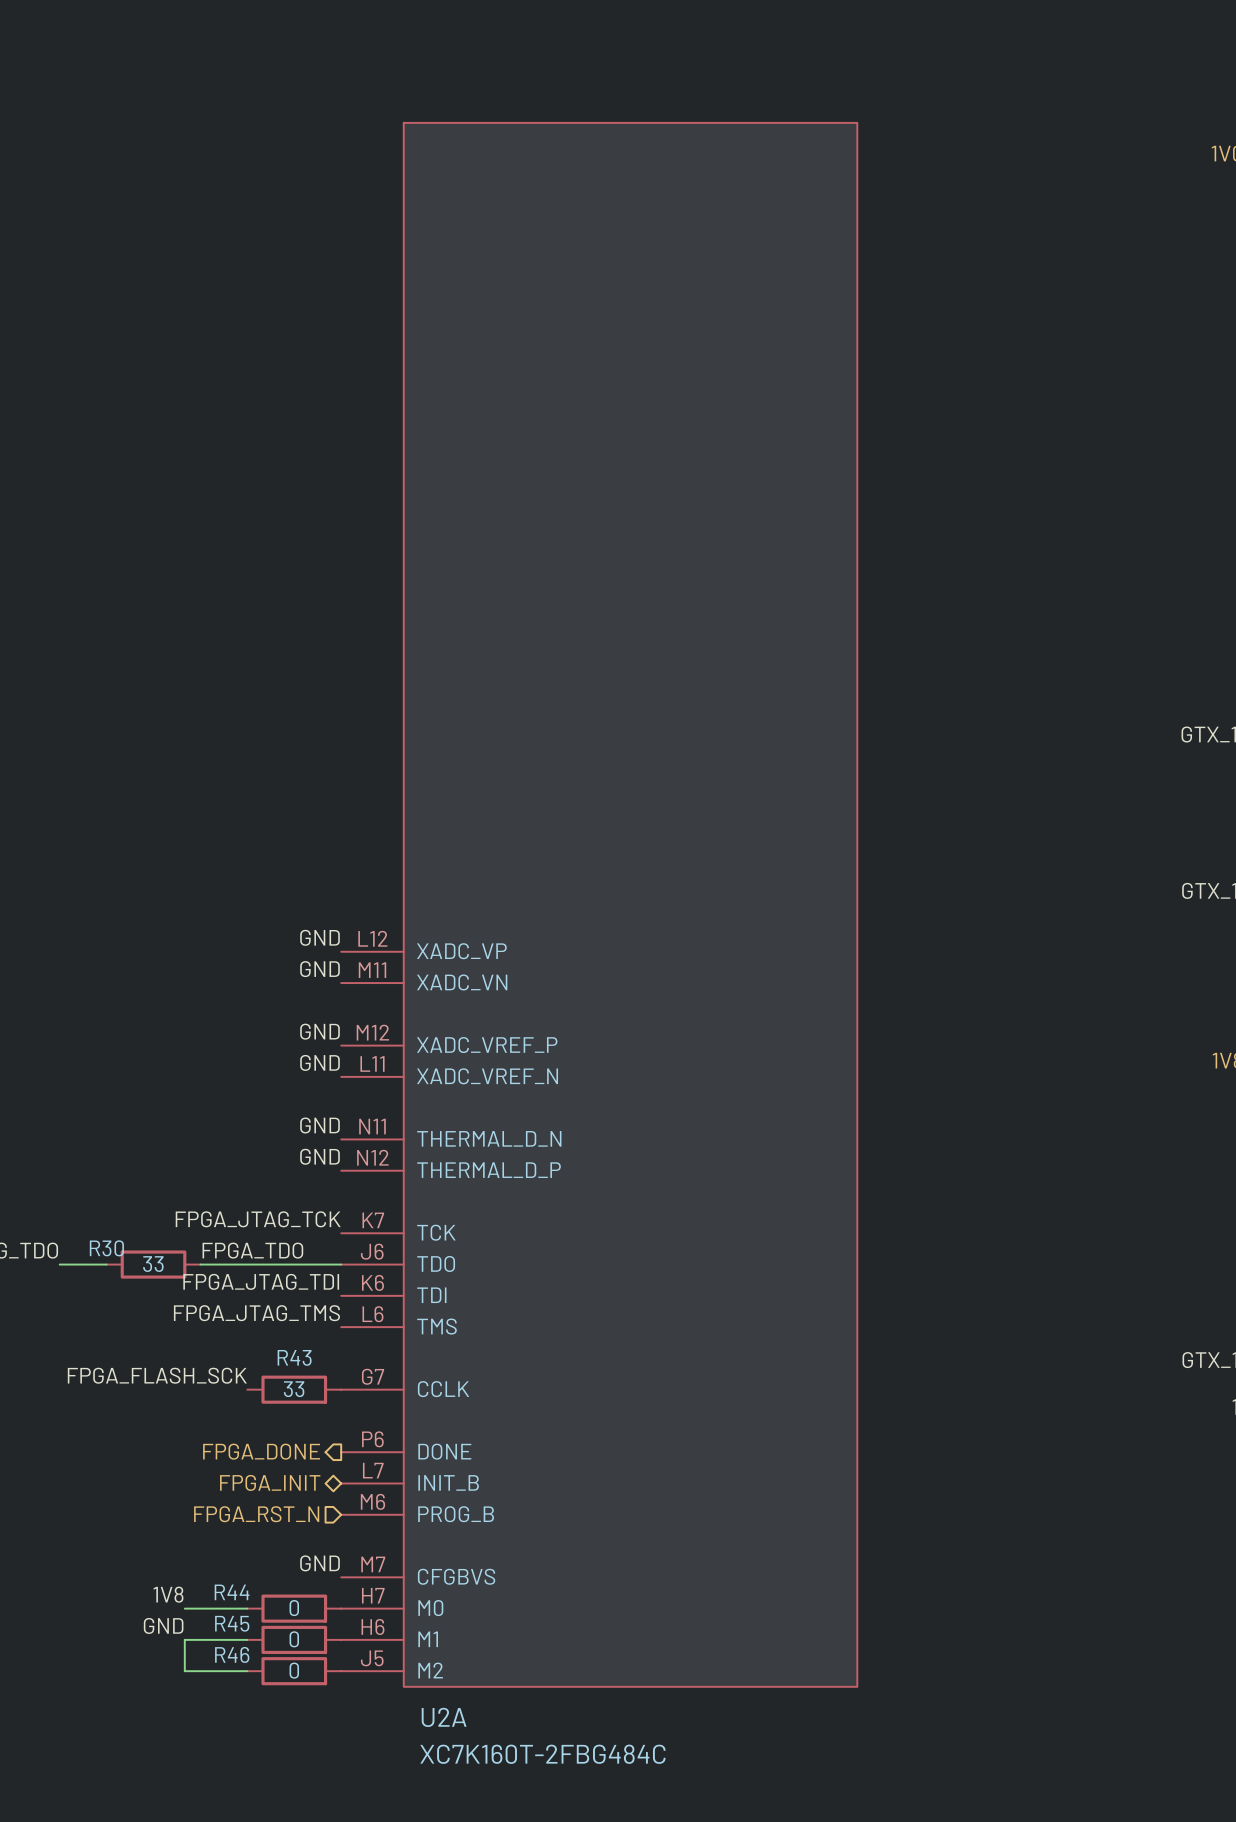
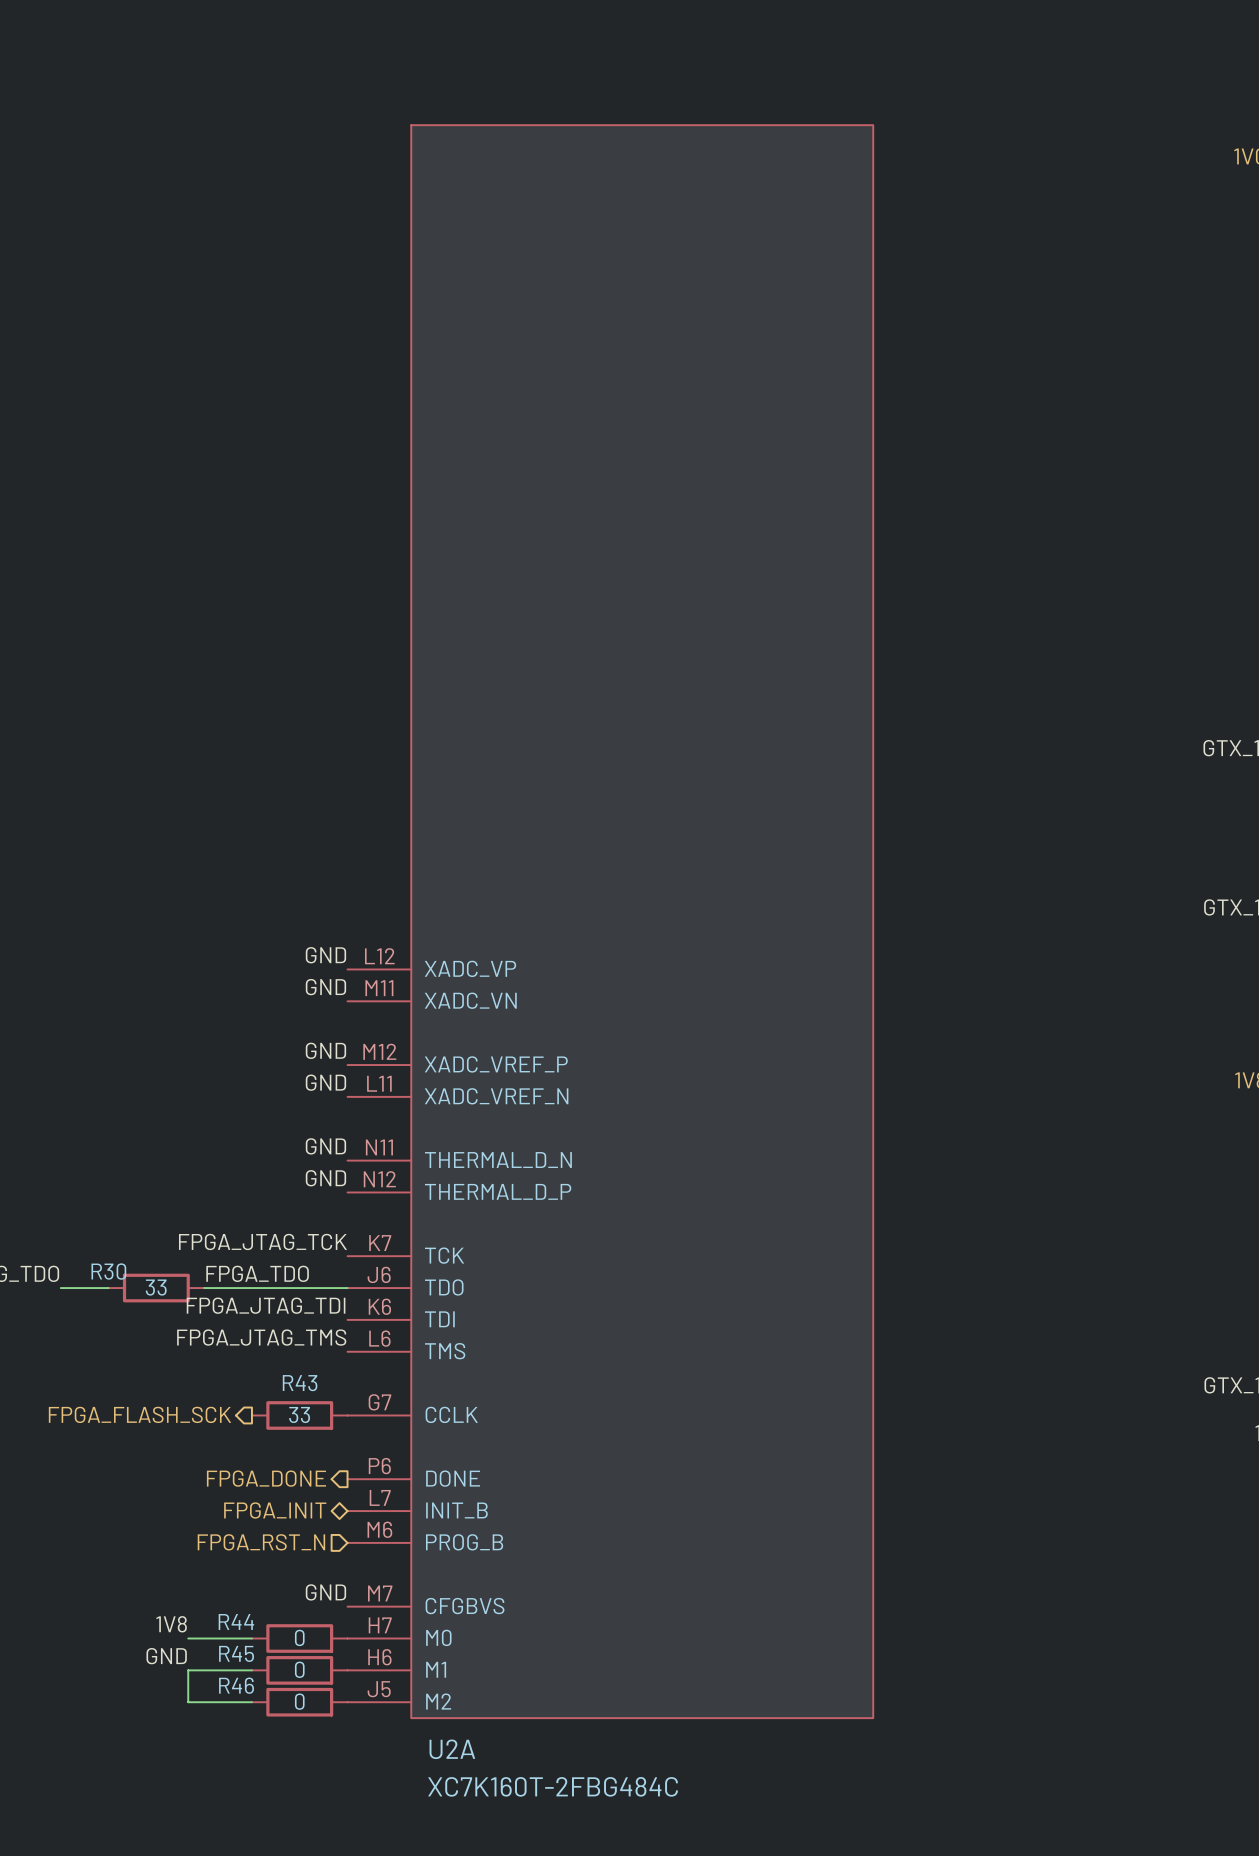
label: FPGA_FLASH_SCK (157, 1375) -> none
hierarchical label: none -> FPGA_FLASH_SCK (139, 1414)

